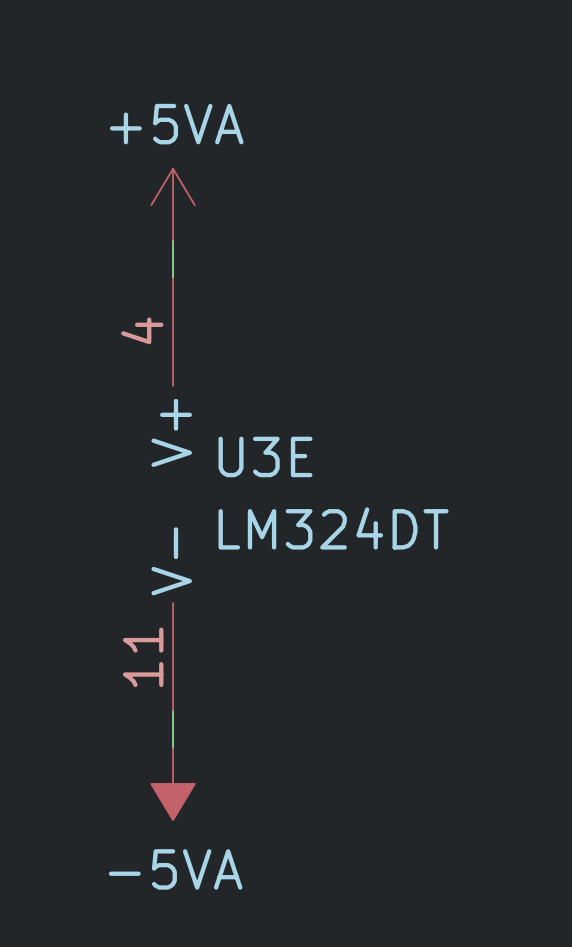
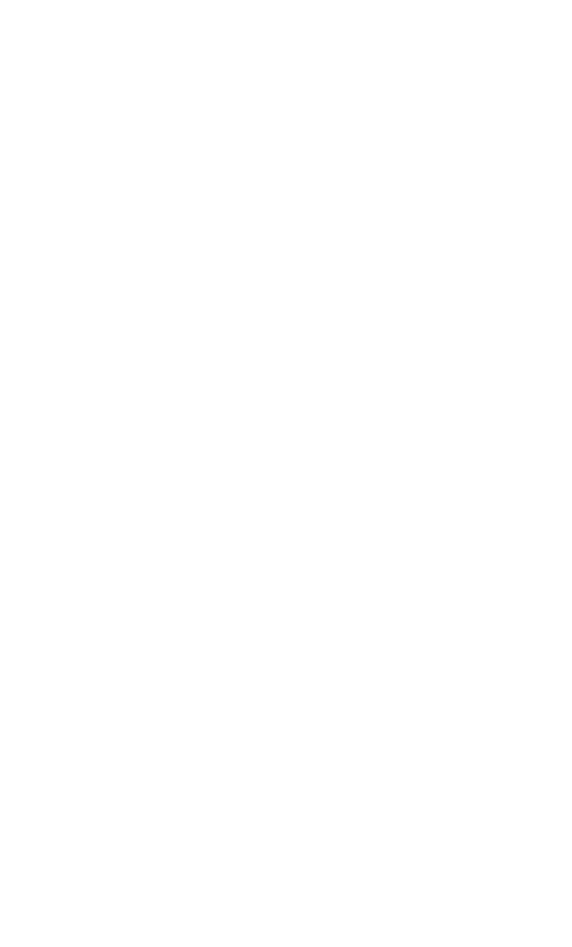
power symbol: +5VA (173, 205) -> none
wire: (173, 241) (173, 277) -> none
U3E: LM324DT (173, 494) -> none
wire: (173, 711) (173, 747) -> none
power symbol: -5VA (173, 783) -> none

